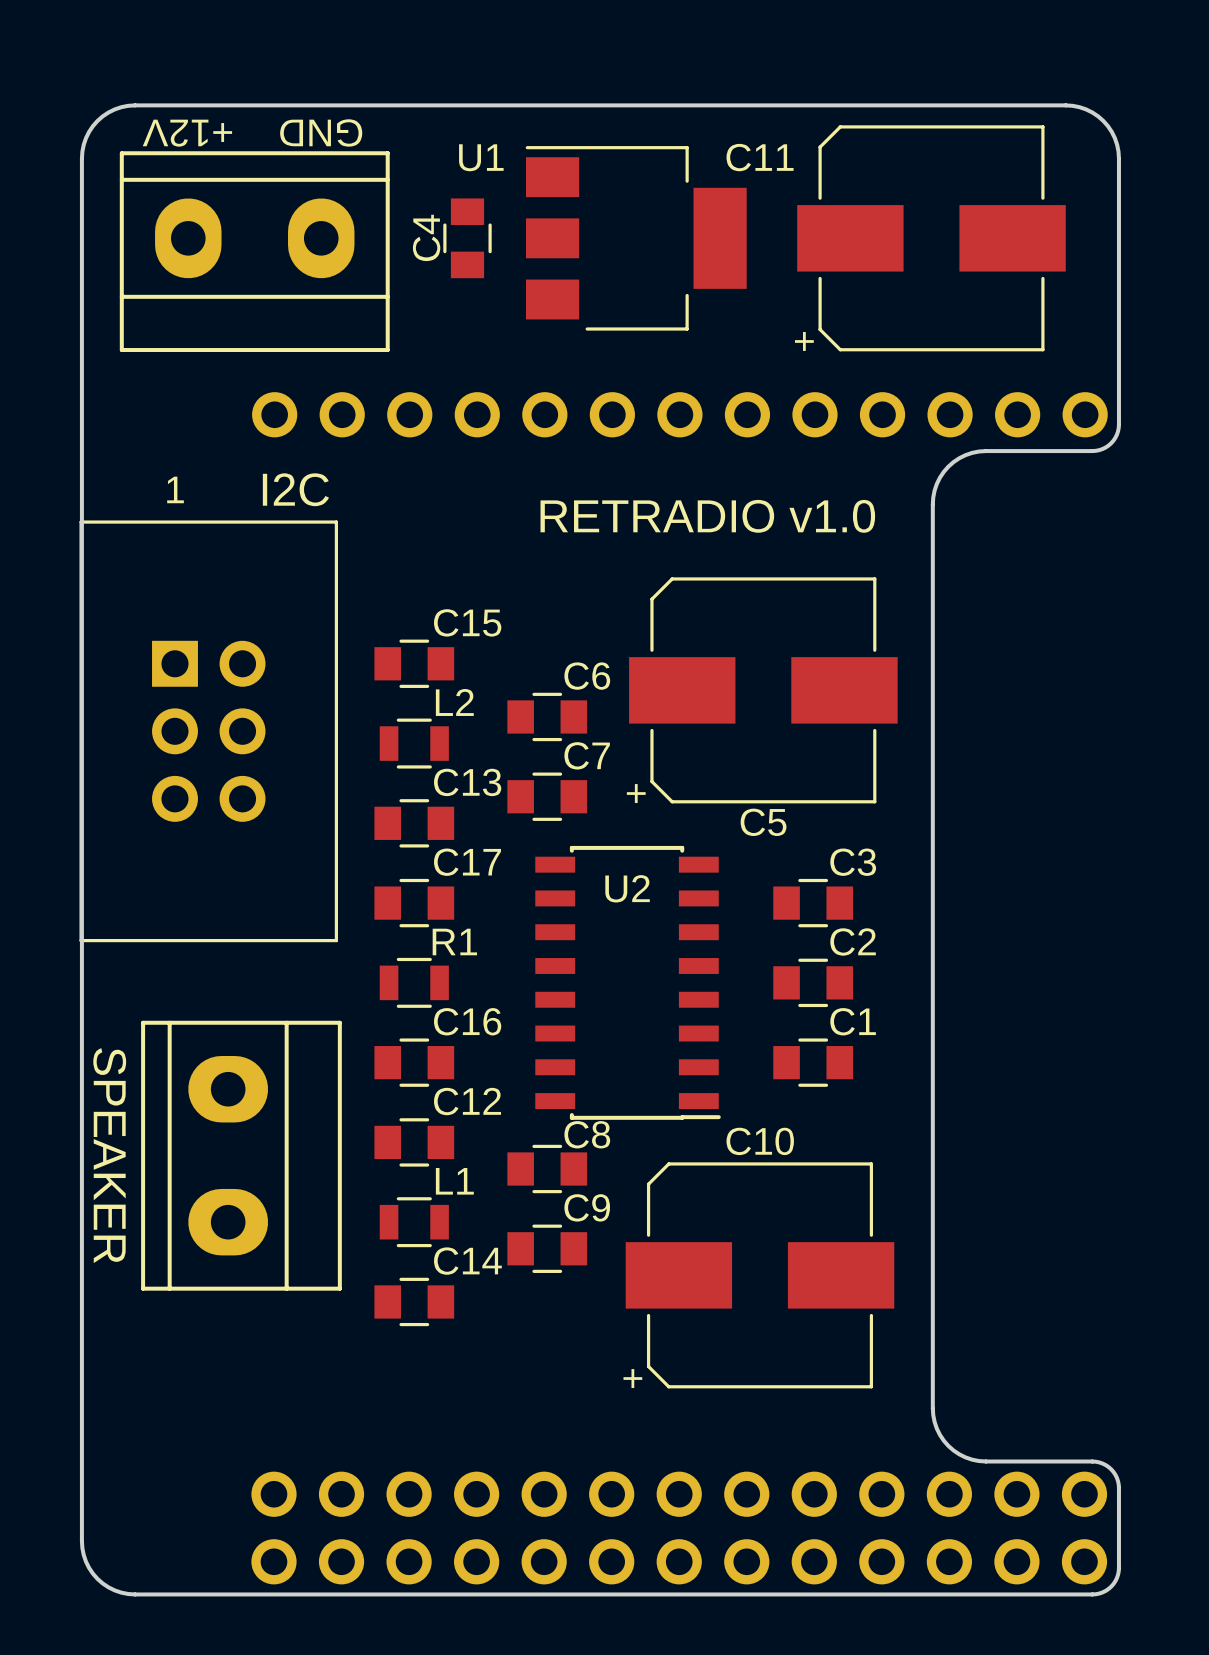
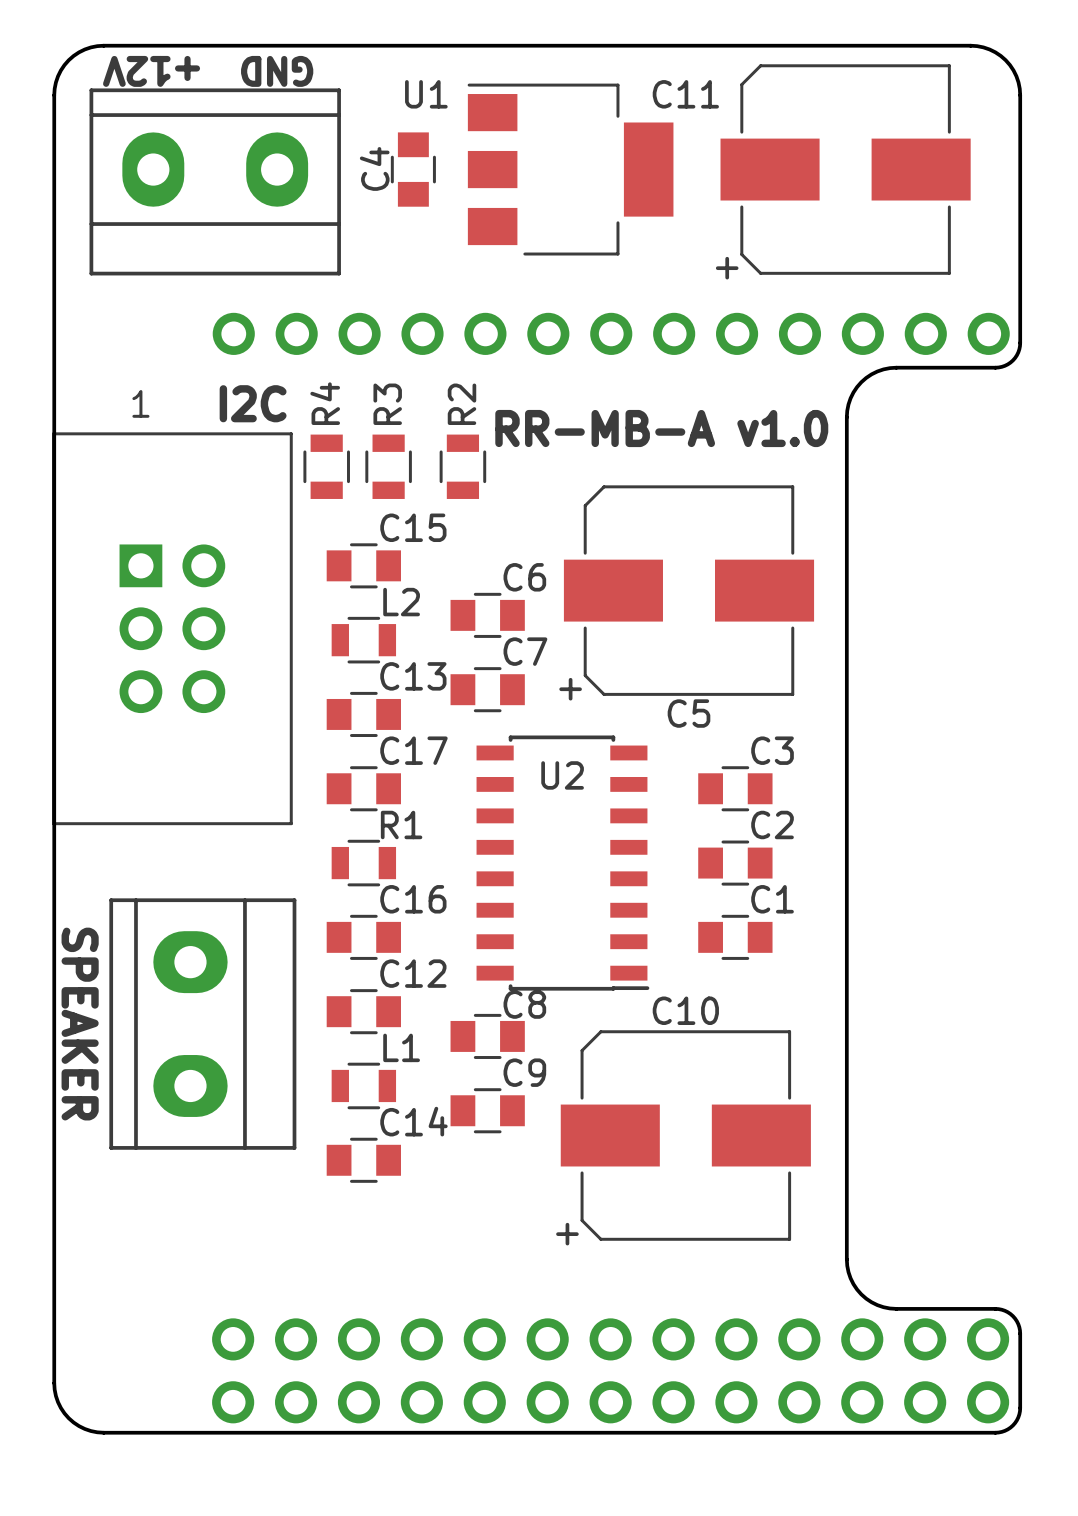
text: RETRADIO v1.0 (707, 516) -> RR-MB-A v1.0 (661, 428)
R4: none -> (326, 466)
R3: none -> (388, 466)
R2: none -> (462, 466)

